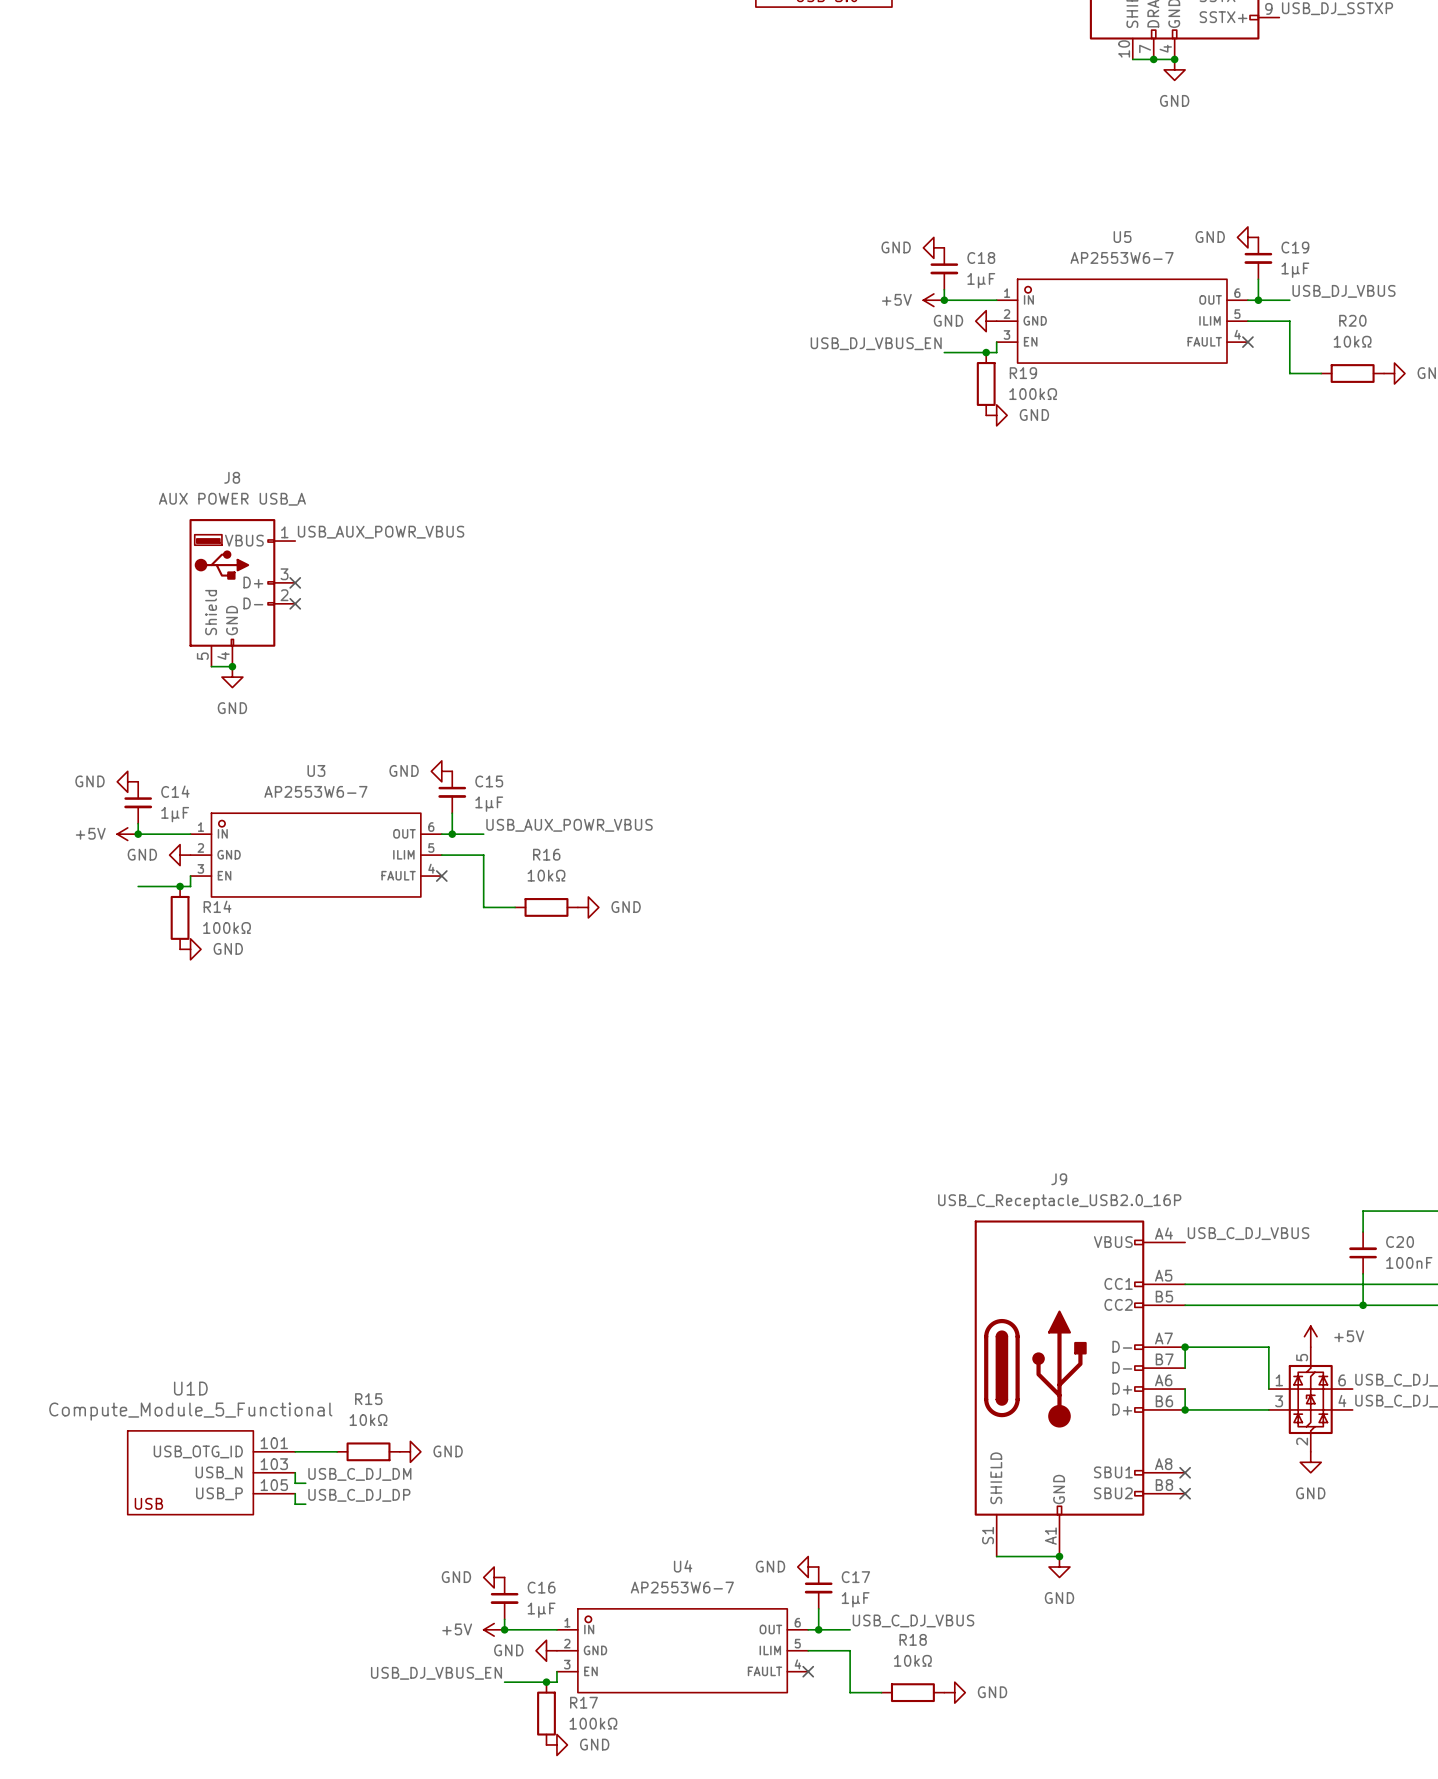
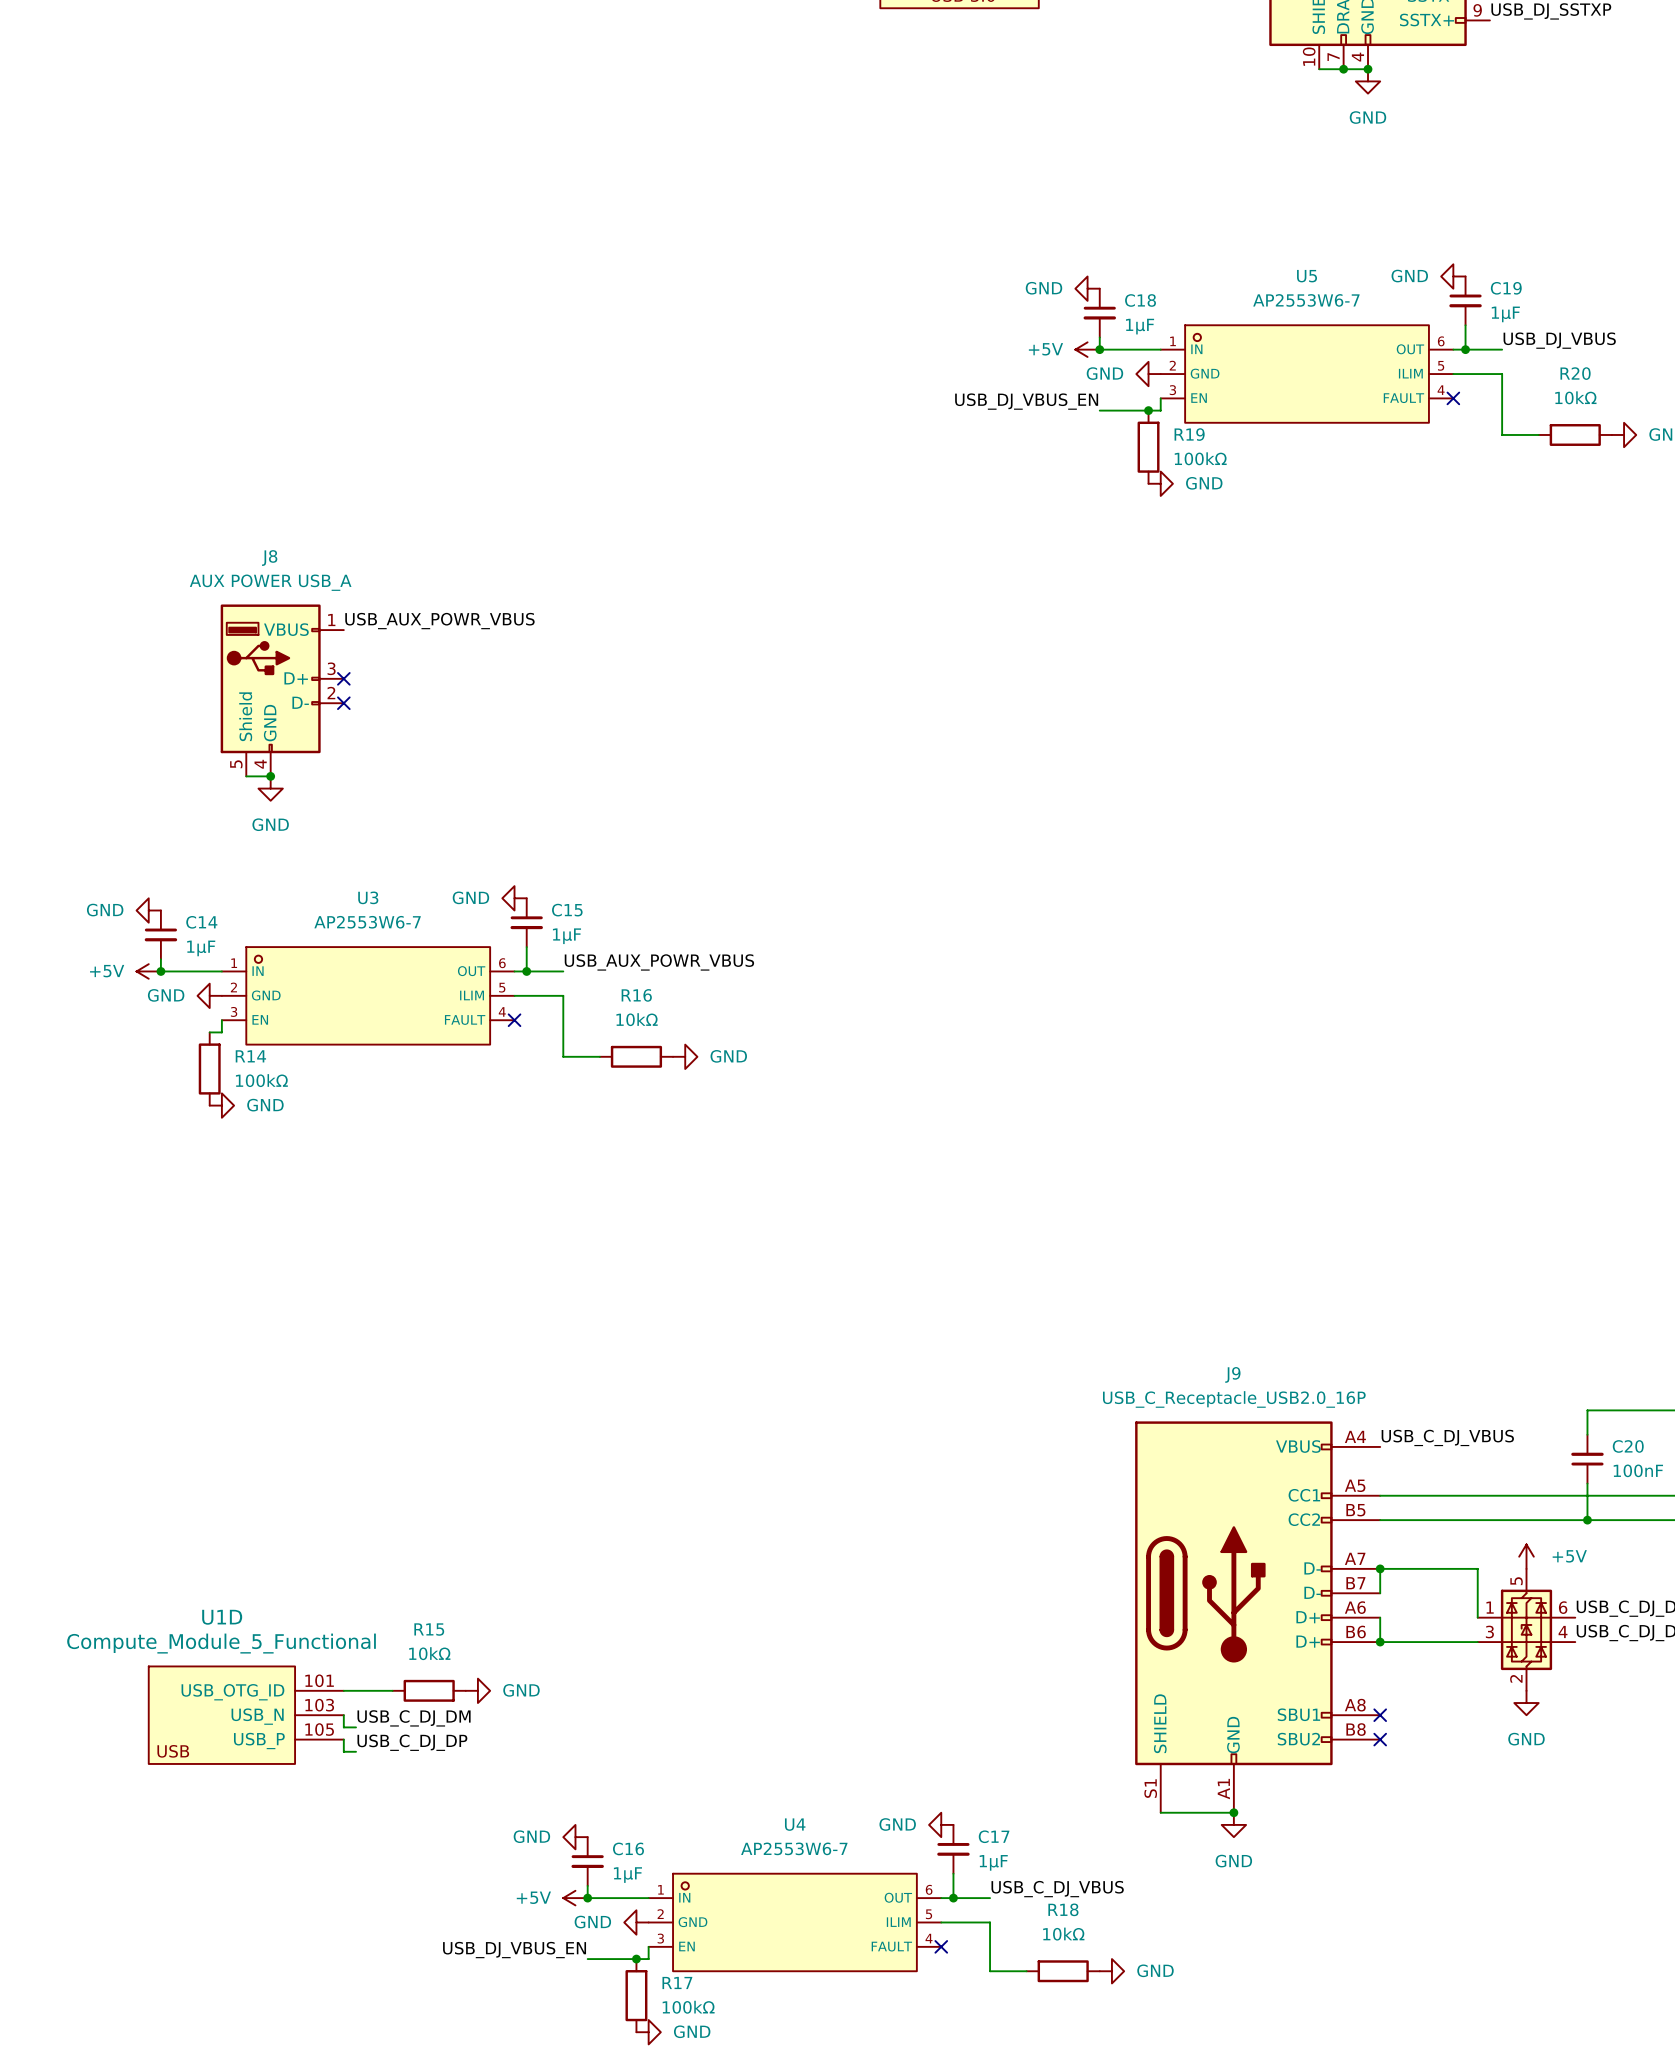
wire: (138, 886) (180, 886) -> none
junction: (180, 886) -> none

